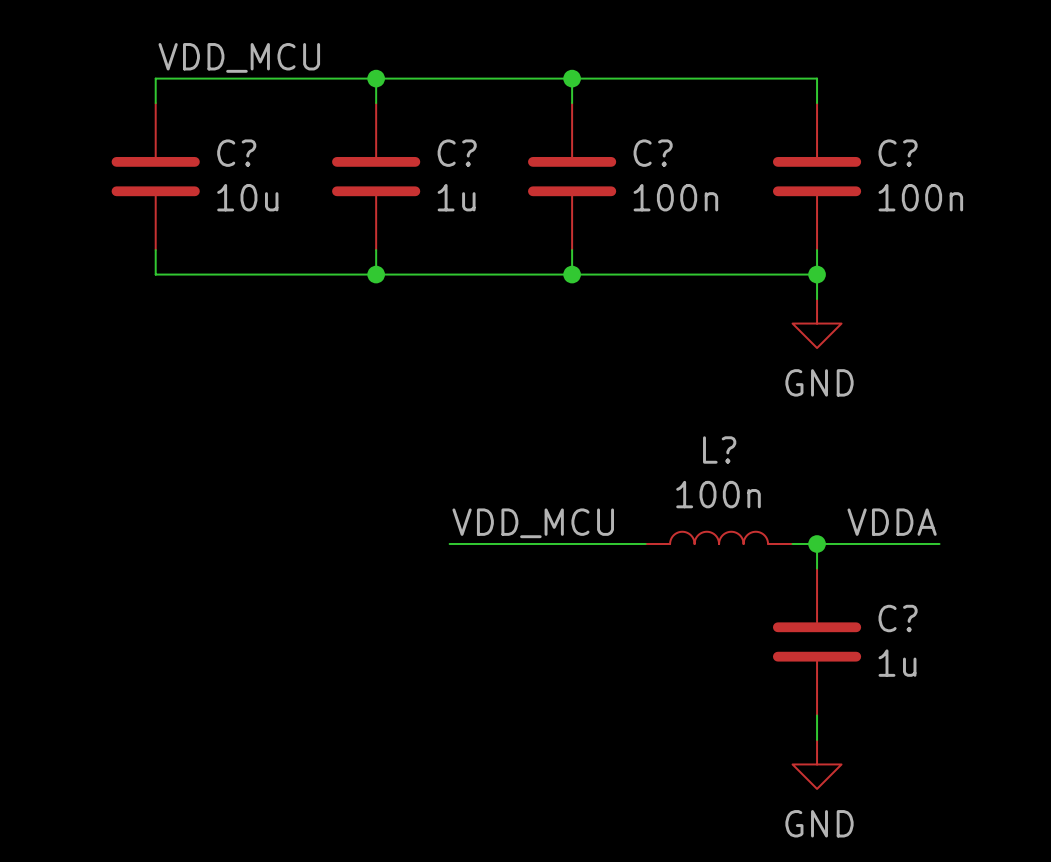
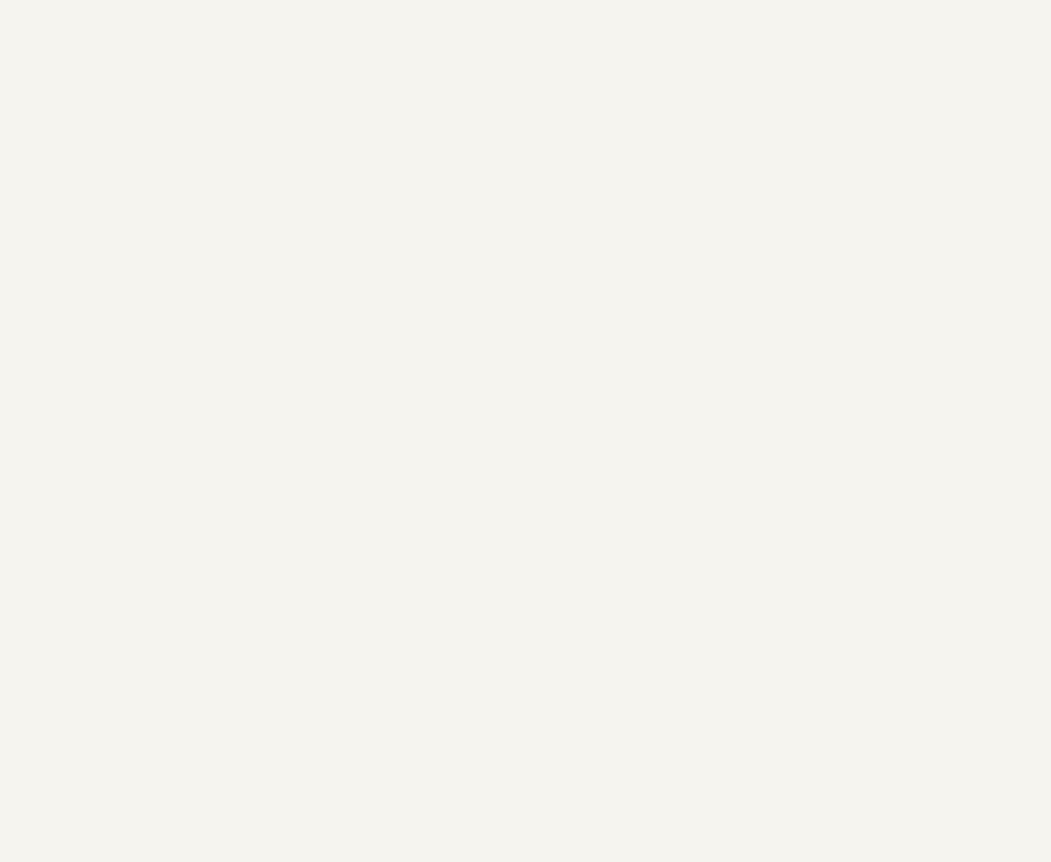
label: VDD_MCU (239, 57) -> none
wire: (376, 78) (376, 103) -> none
junction: (376, 78) -> none
wire: (572, 78) (572, 103) -> none
junction: (572, 78) -> none
wire: (155, 103) (155, 78) (817, 78) (817, 103) -> none
C?: 10u (155, 176) -> none
C?: 1u (376, 176) -> none
C?: 100n (572, 176) -> none
C?: 100n (817, 176) -> none
wire: (155, 250) (155, 274) (817, 274) -> none
wire: (376, 250) (376, 274) -> none
wire: (572, 250) (572, 274) -> none
wire: (817, 250) (817, 299) -> none
junction: (376, 274) -> none
junction: (572, 274) -> none
junction: (817, 274) -> none
power symbol: GND (817, 323) -> none
label: VDDA (892, 522) -> none
label: VDD_MCU (533, 523) -> none
L?: 100n (719, 537) -> none
wire: (449, 543) (645, 543) -> none
wire: (792, 543) (939, 543) -> none
wire: (817, 543) (817, 568) -> none
junction: (817, 543) -> none
C?: 1u (817, 641) -> none
wire: (817, 715) (817, 739) -> none
power symbol: GND (817, 764) -> none

